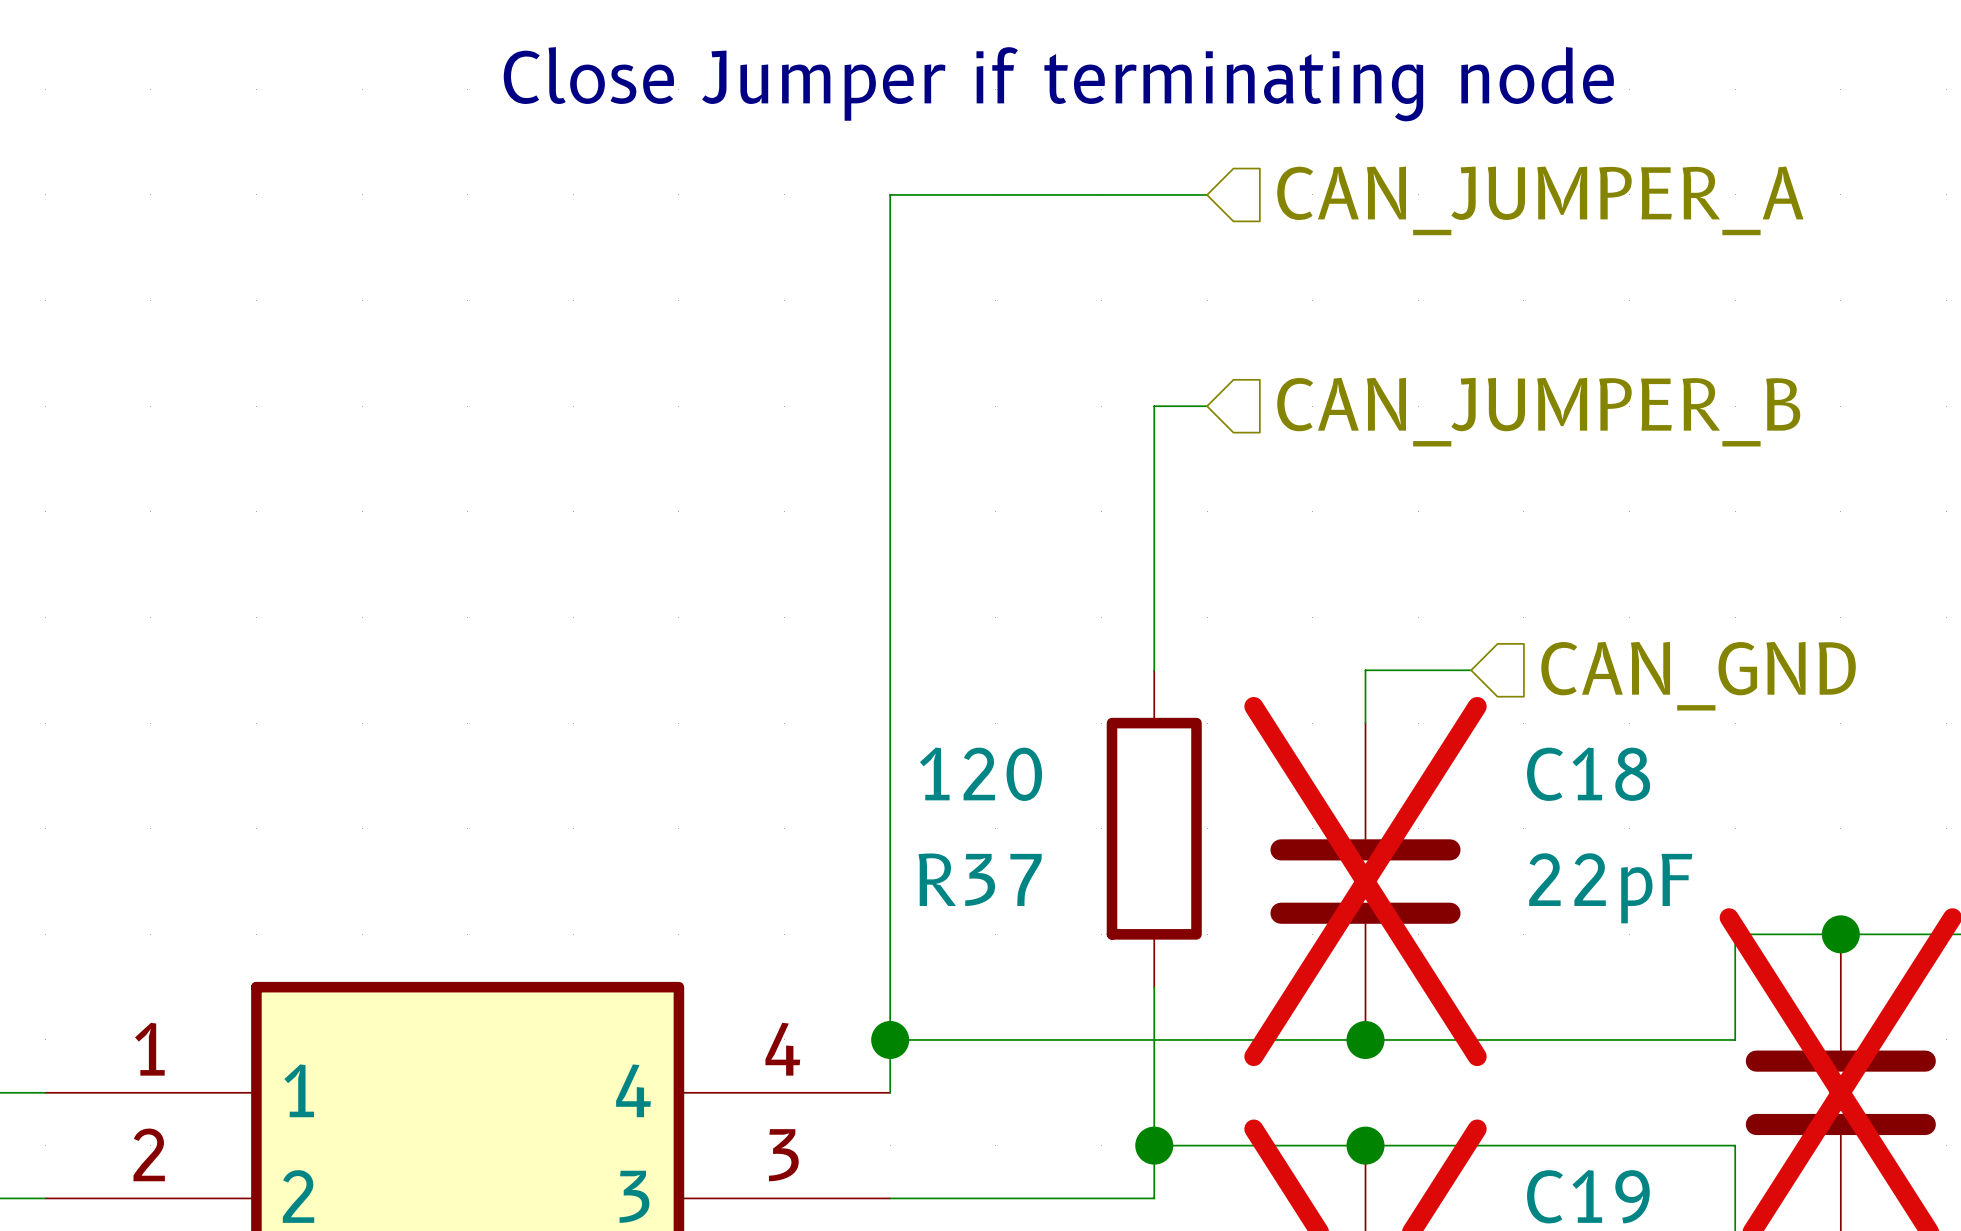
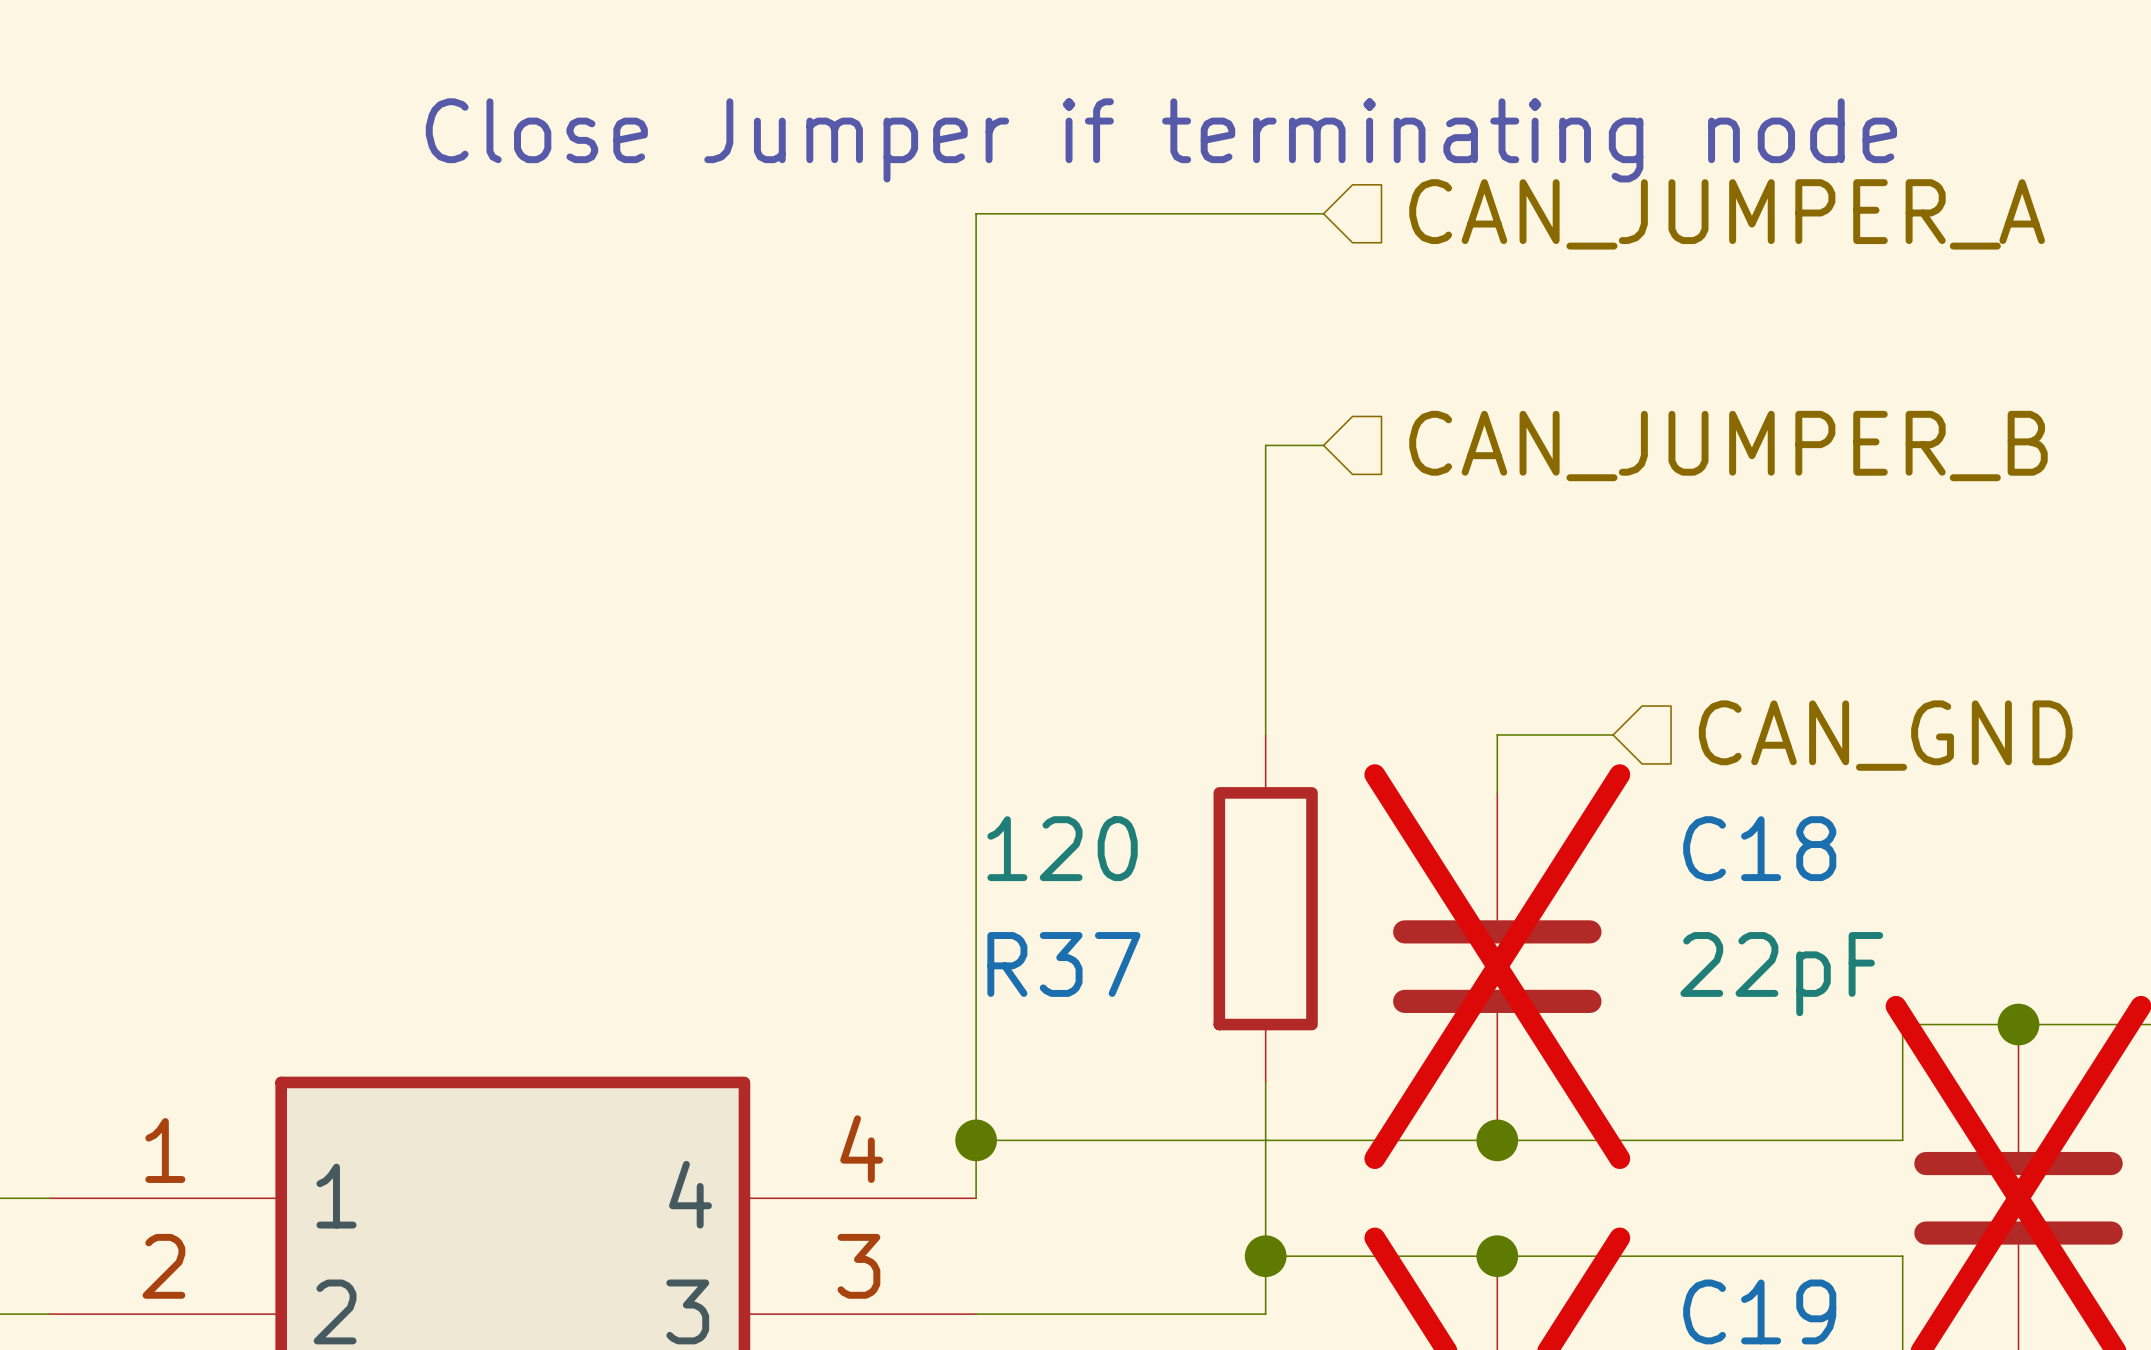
text position: Close Jumper if terminating node (1058, 84) -> Close Jumper if terminating node (1161, 140)

